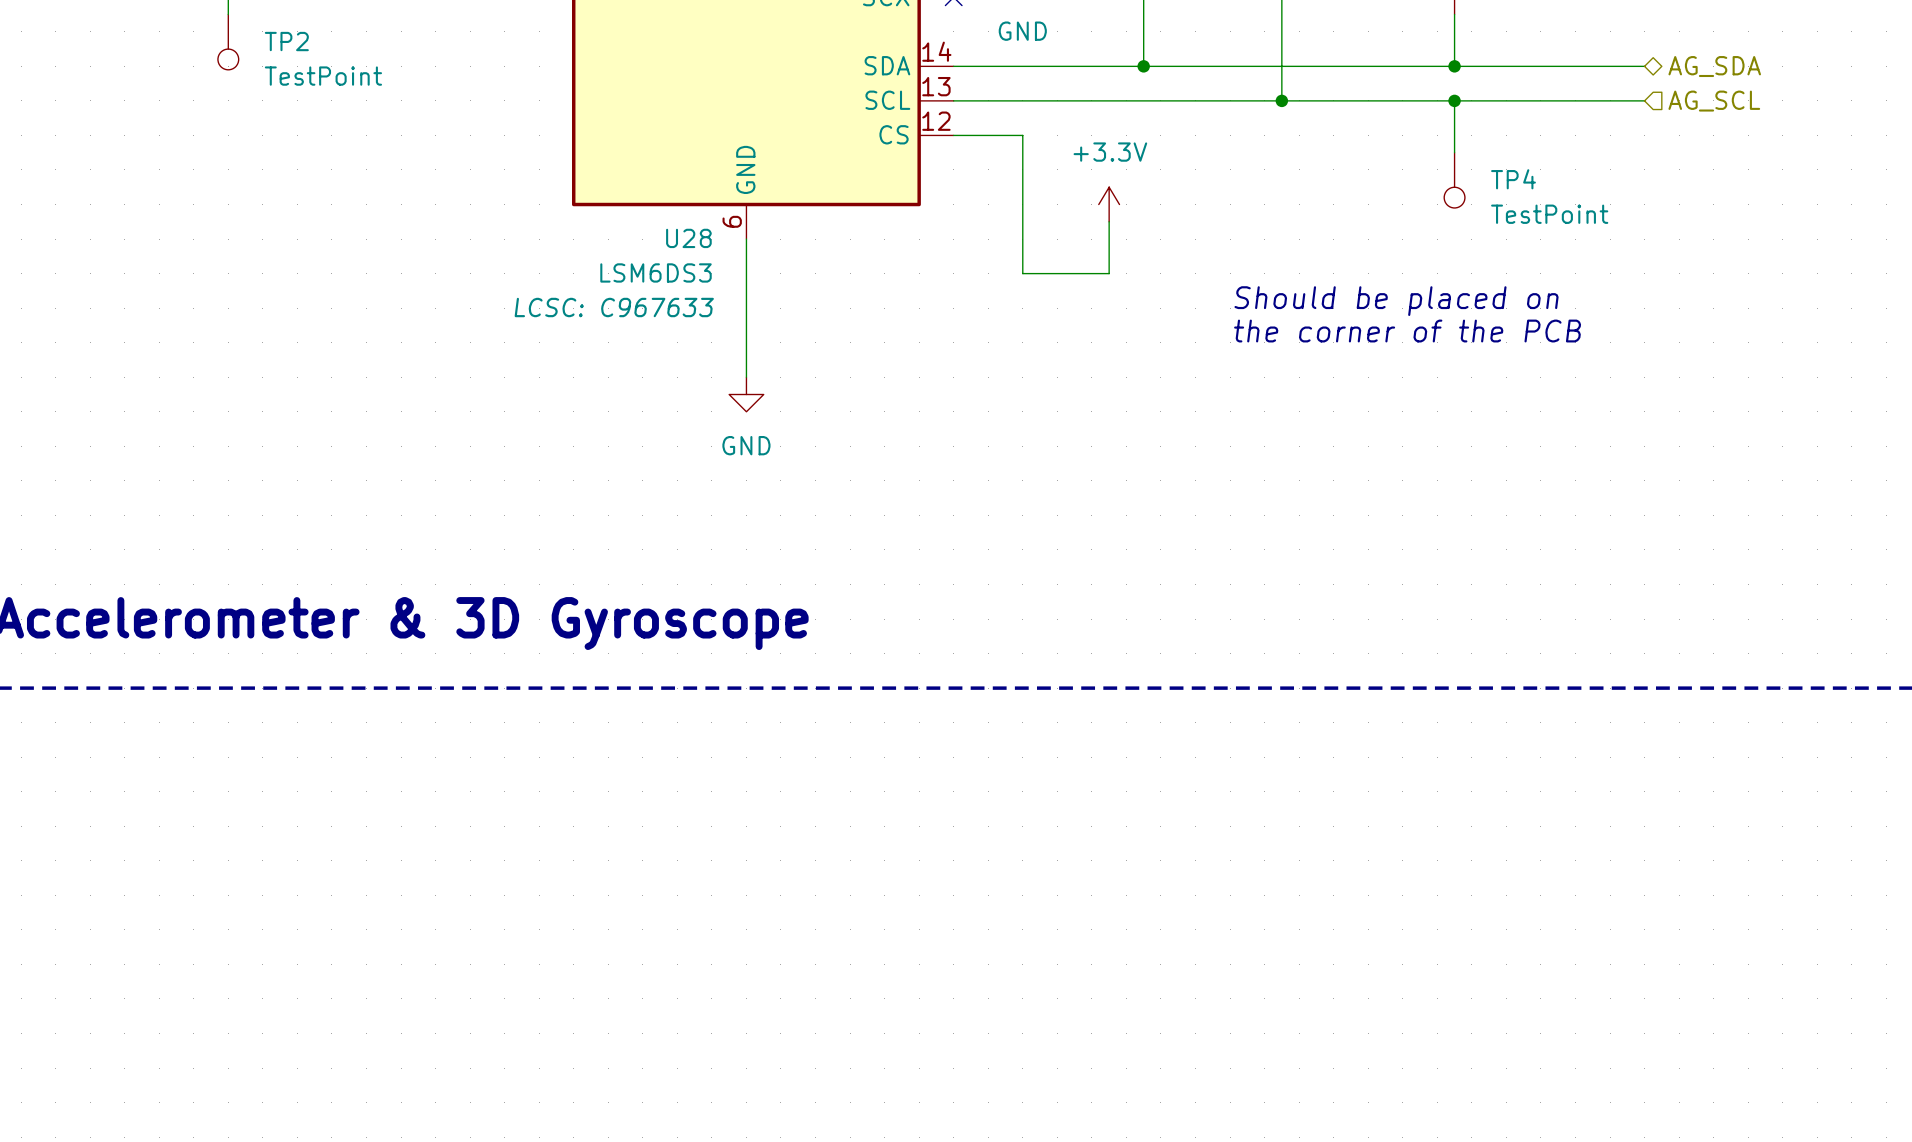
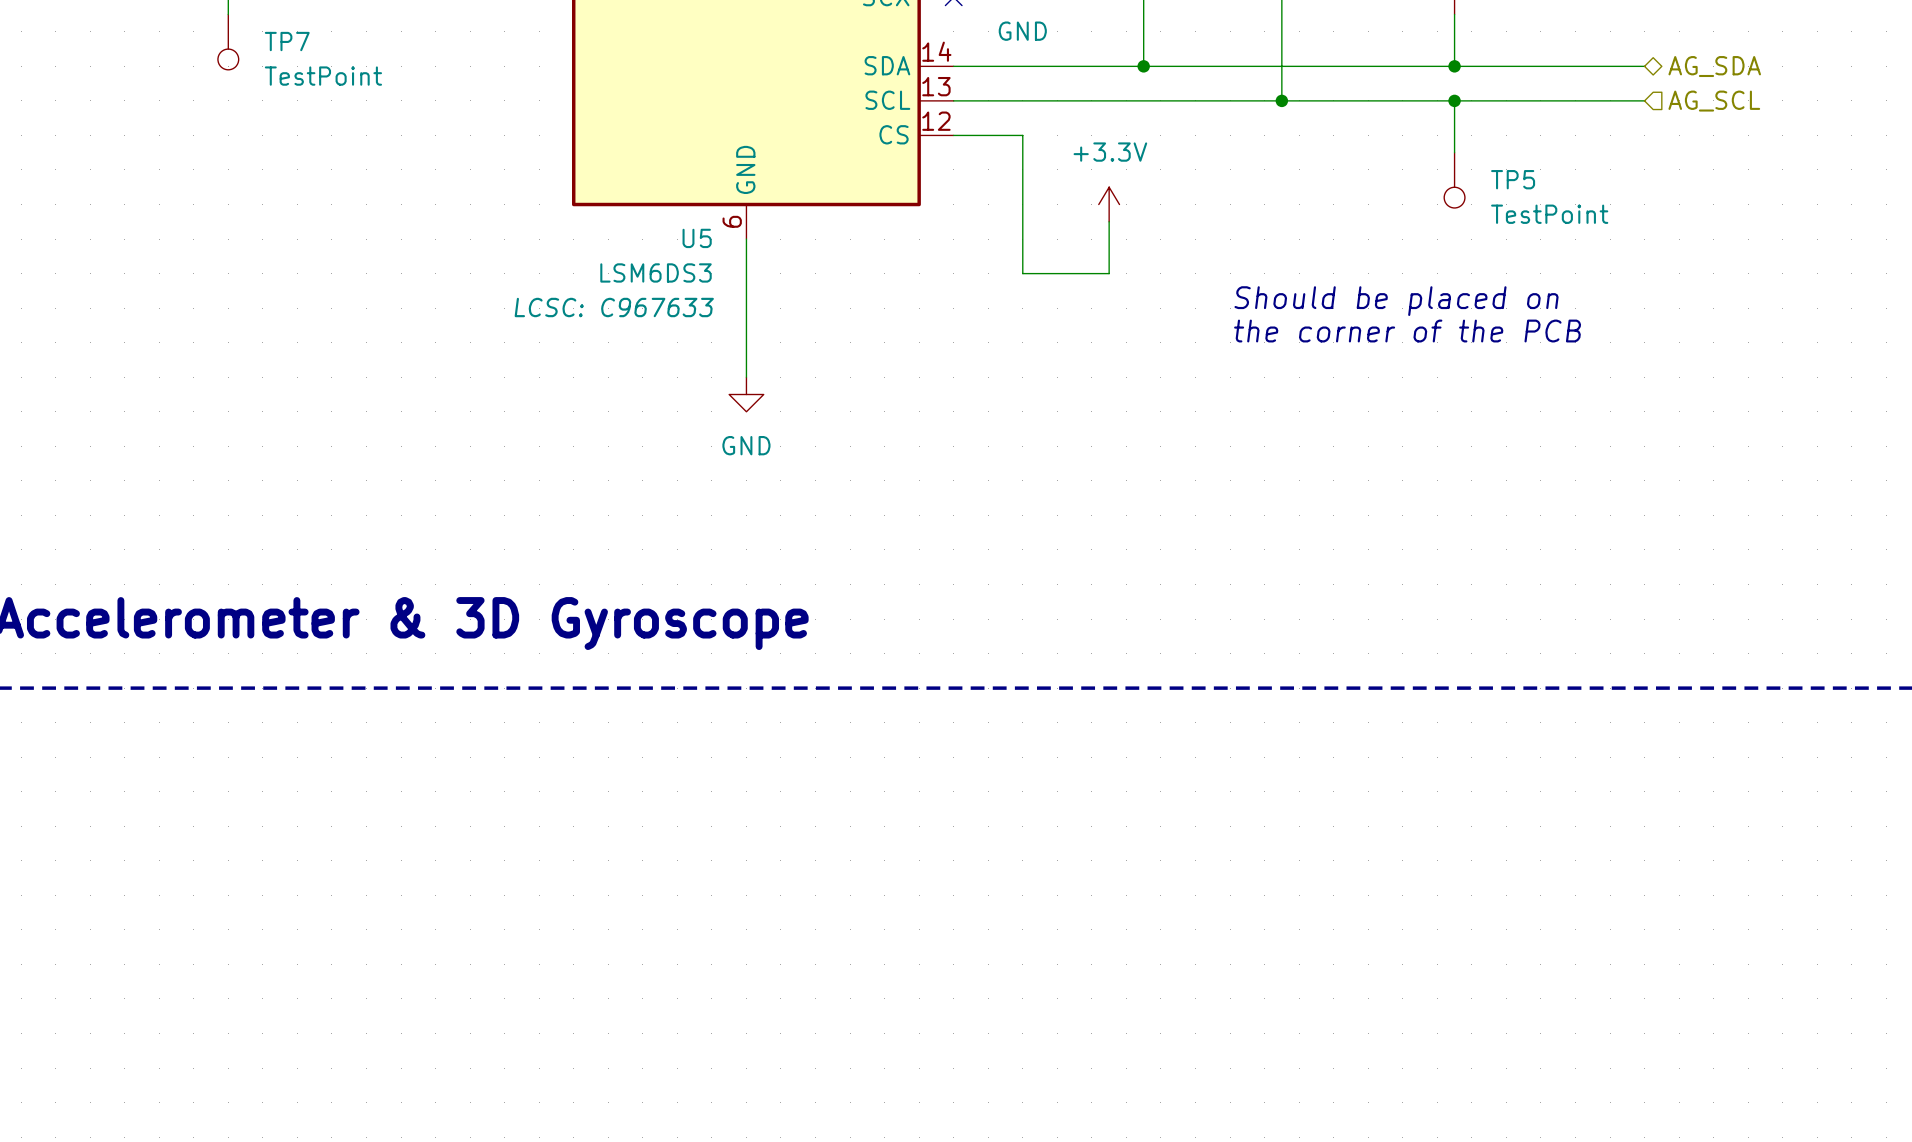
TP2 name: TP2 (286, 41) -> TP7 (287, 41)
TP4 name: TP4 (1513, 179) -> TP5 (1513, 179)
U28 name: U28 (688, 238) -> U5 (697, 238)

